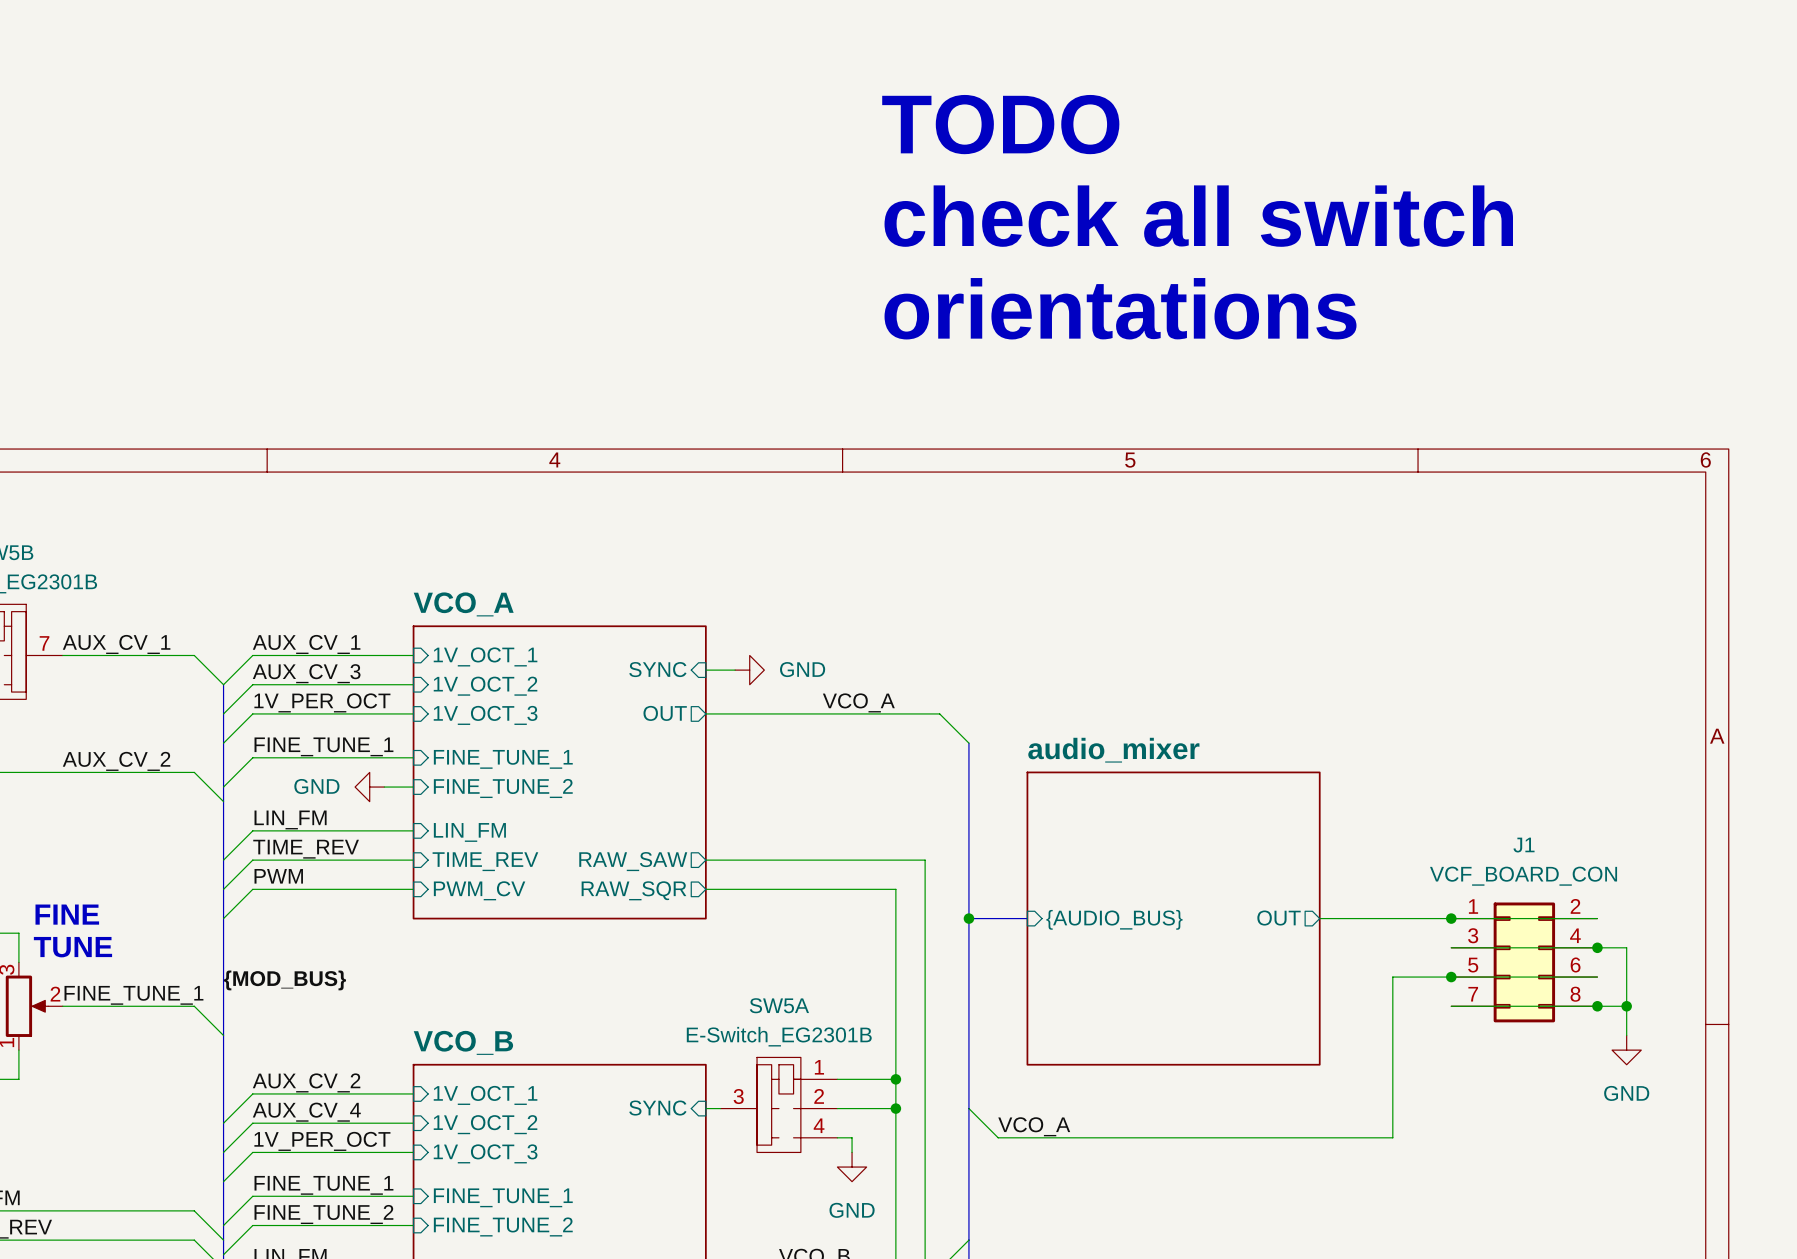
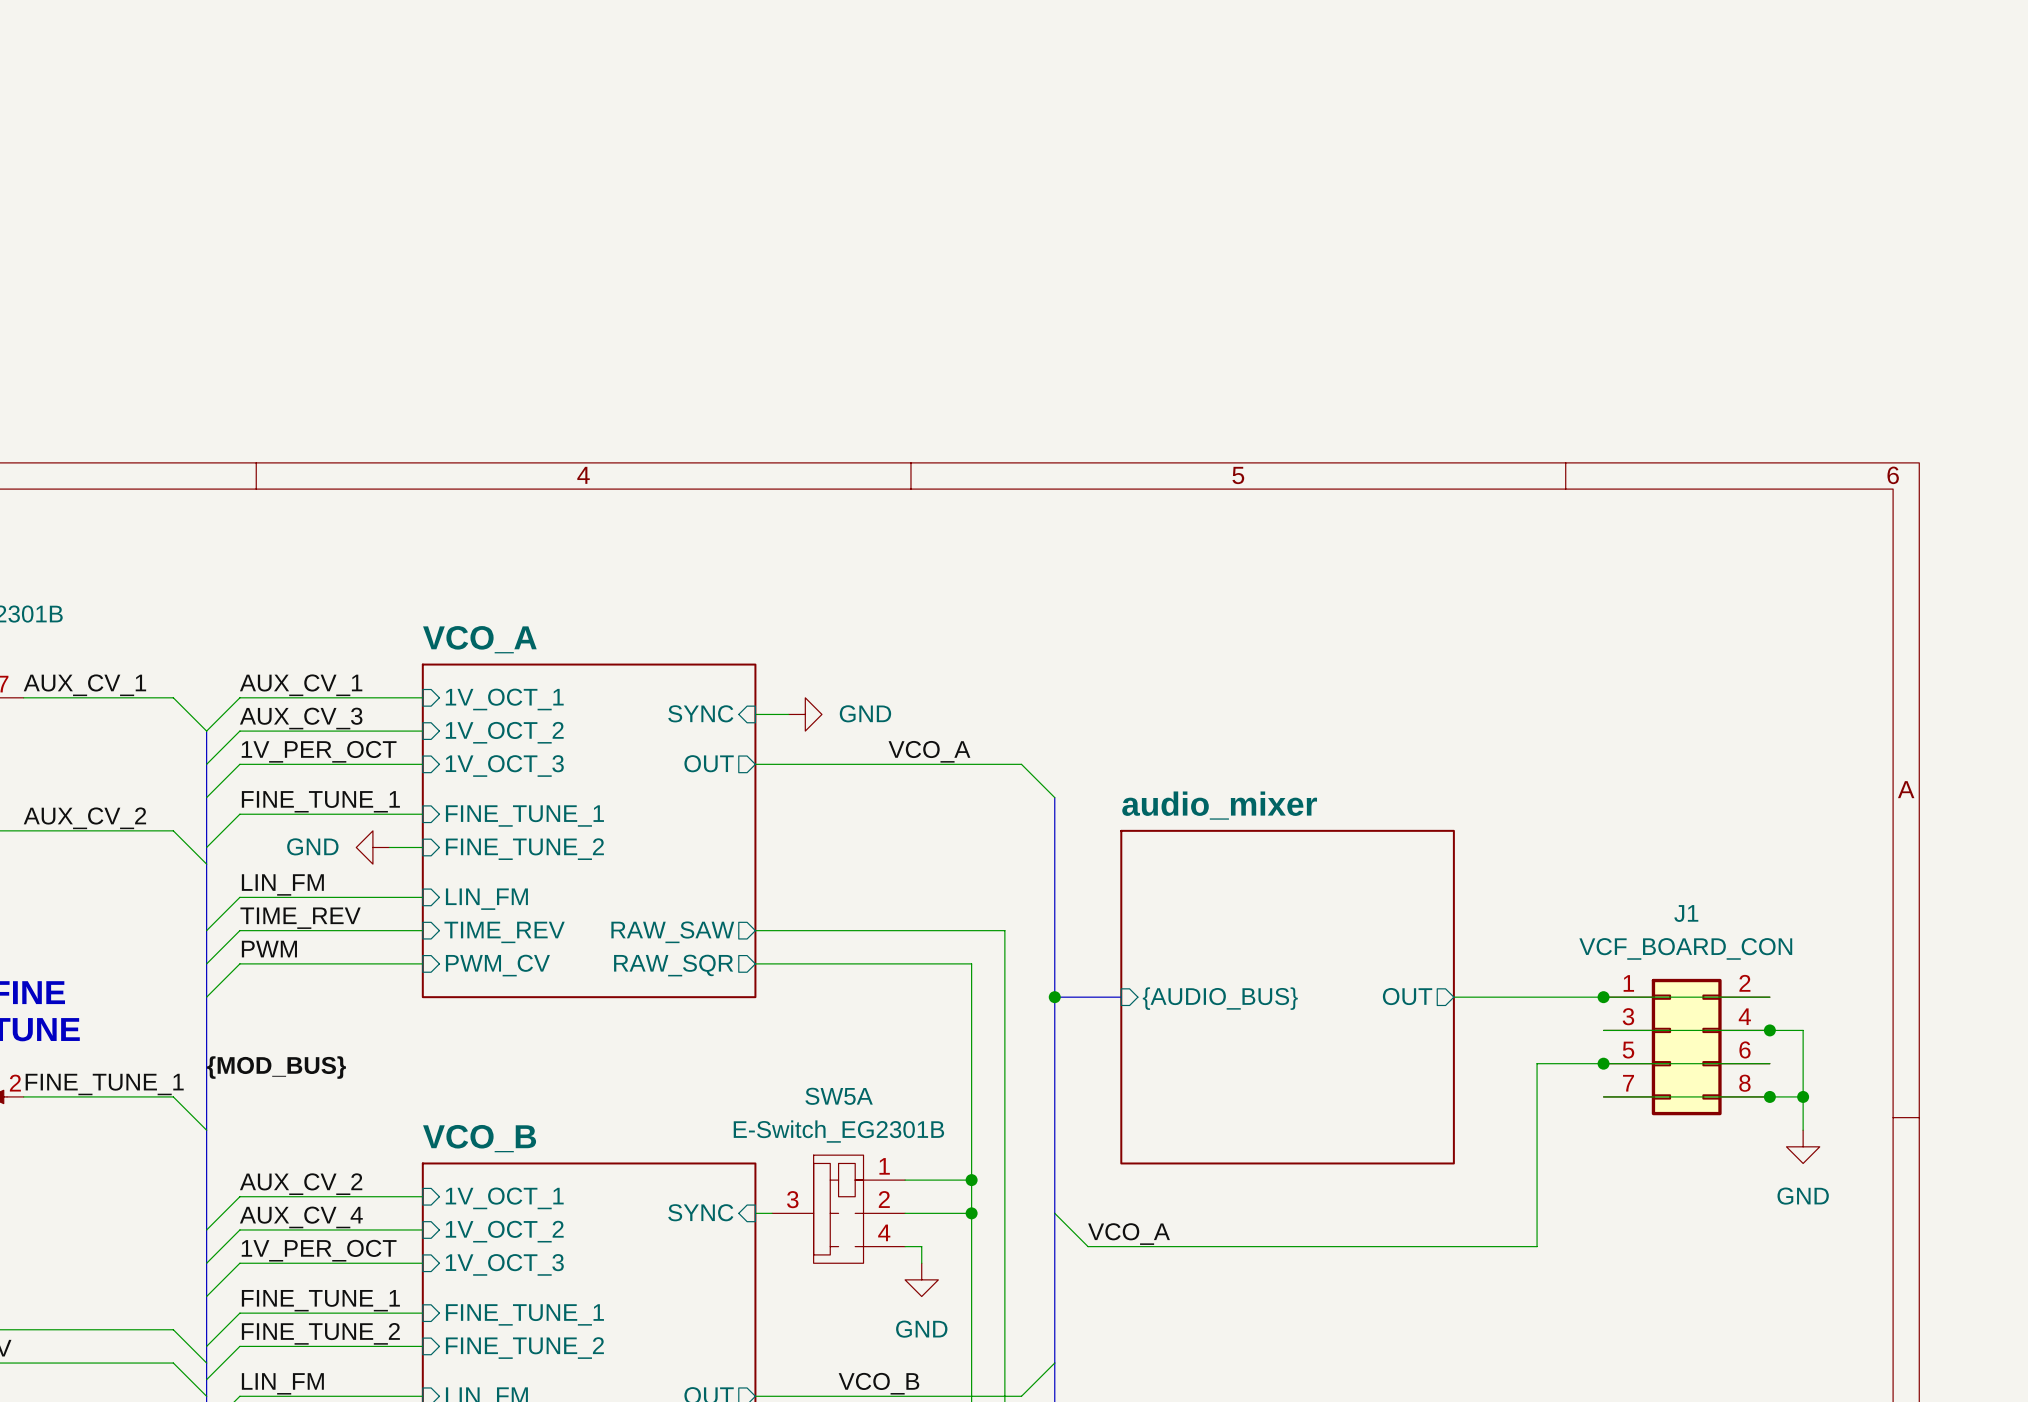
text: TODO (1000, 124) -> none
text: check all switch (1198, 216) -> none
text: orientations (1120, 308) -> none

